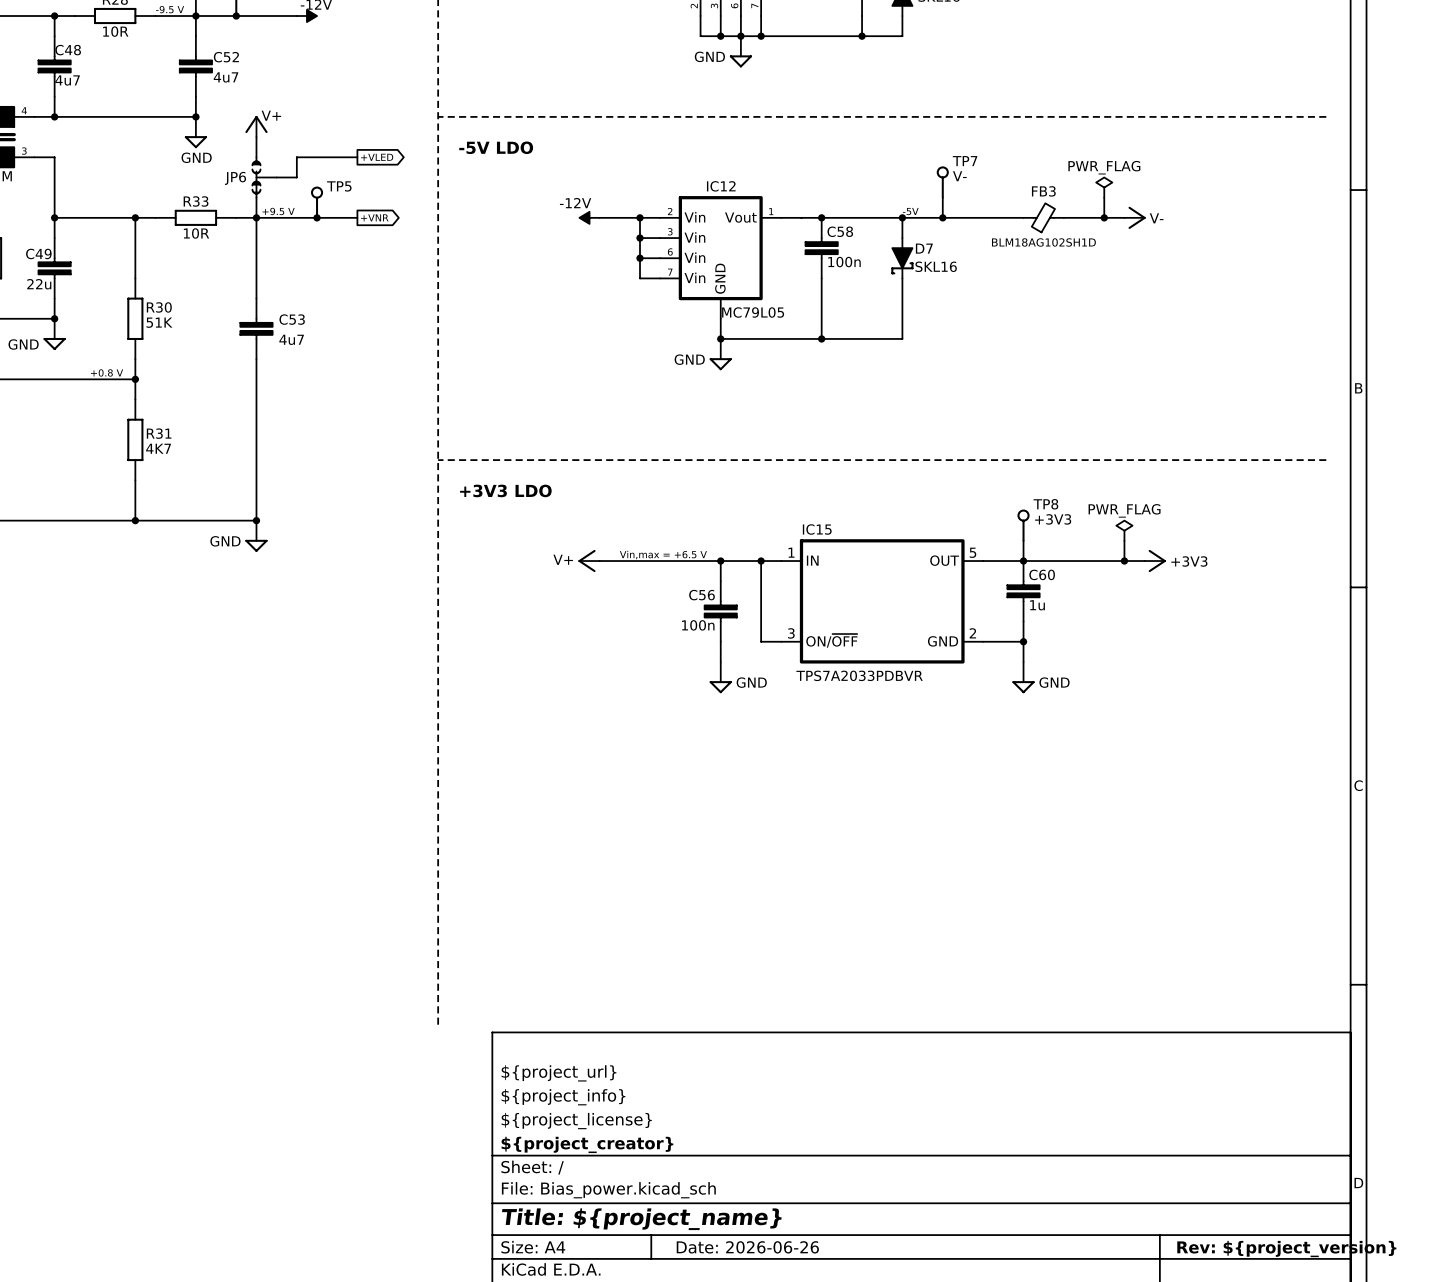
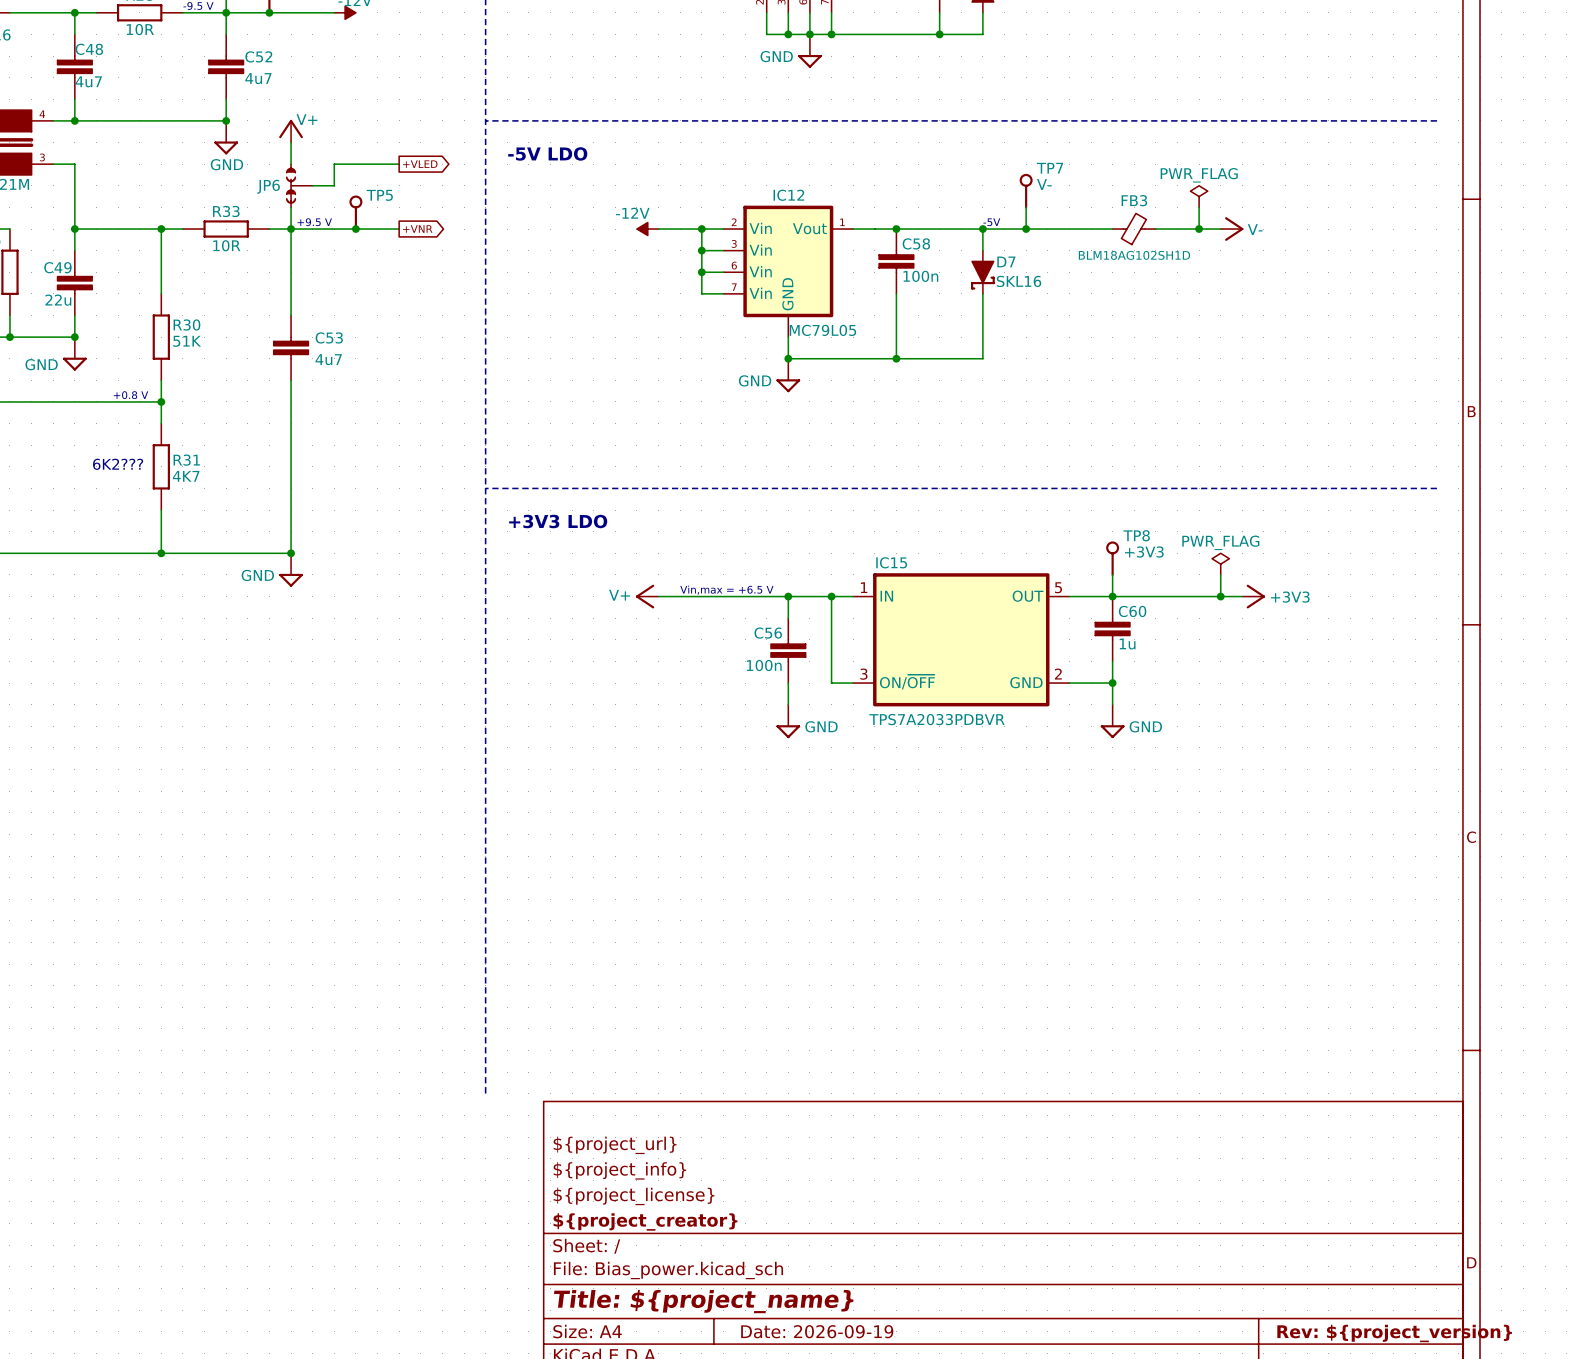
text: none -> 6K2??? (118, 464)
title block: Date: 2026-06-26 (747, 1247) -> Date: 2026-09-19 (817, 1331)

